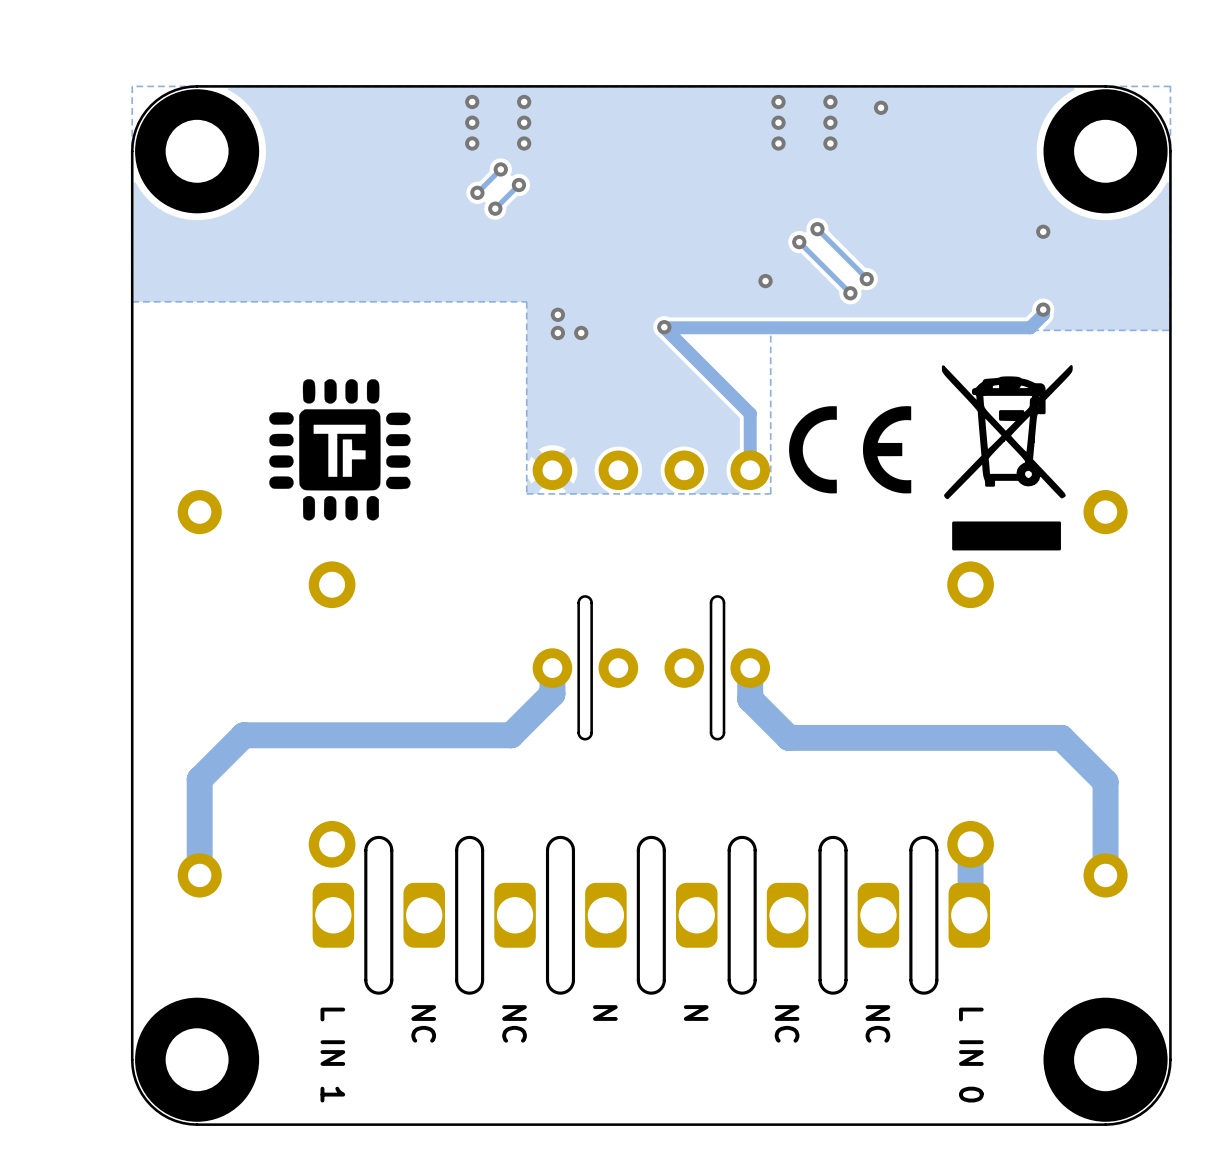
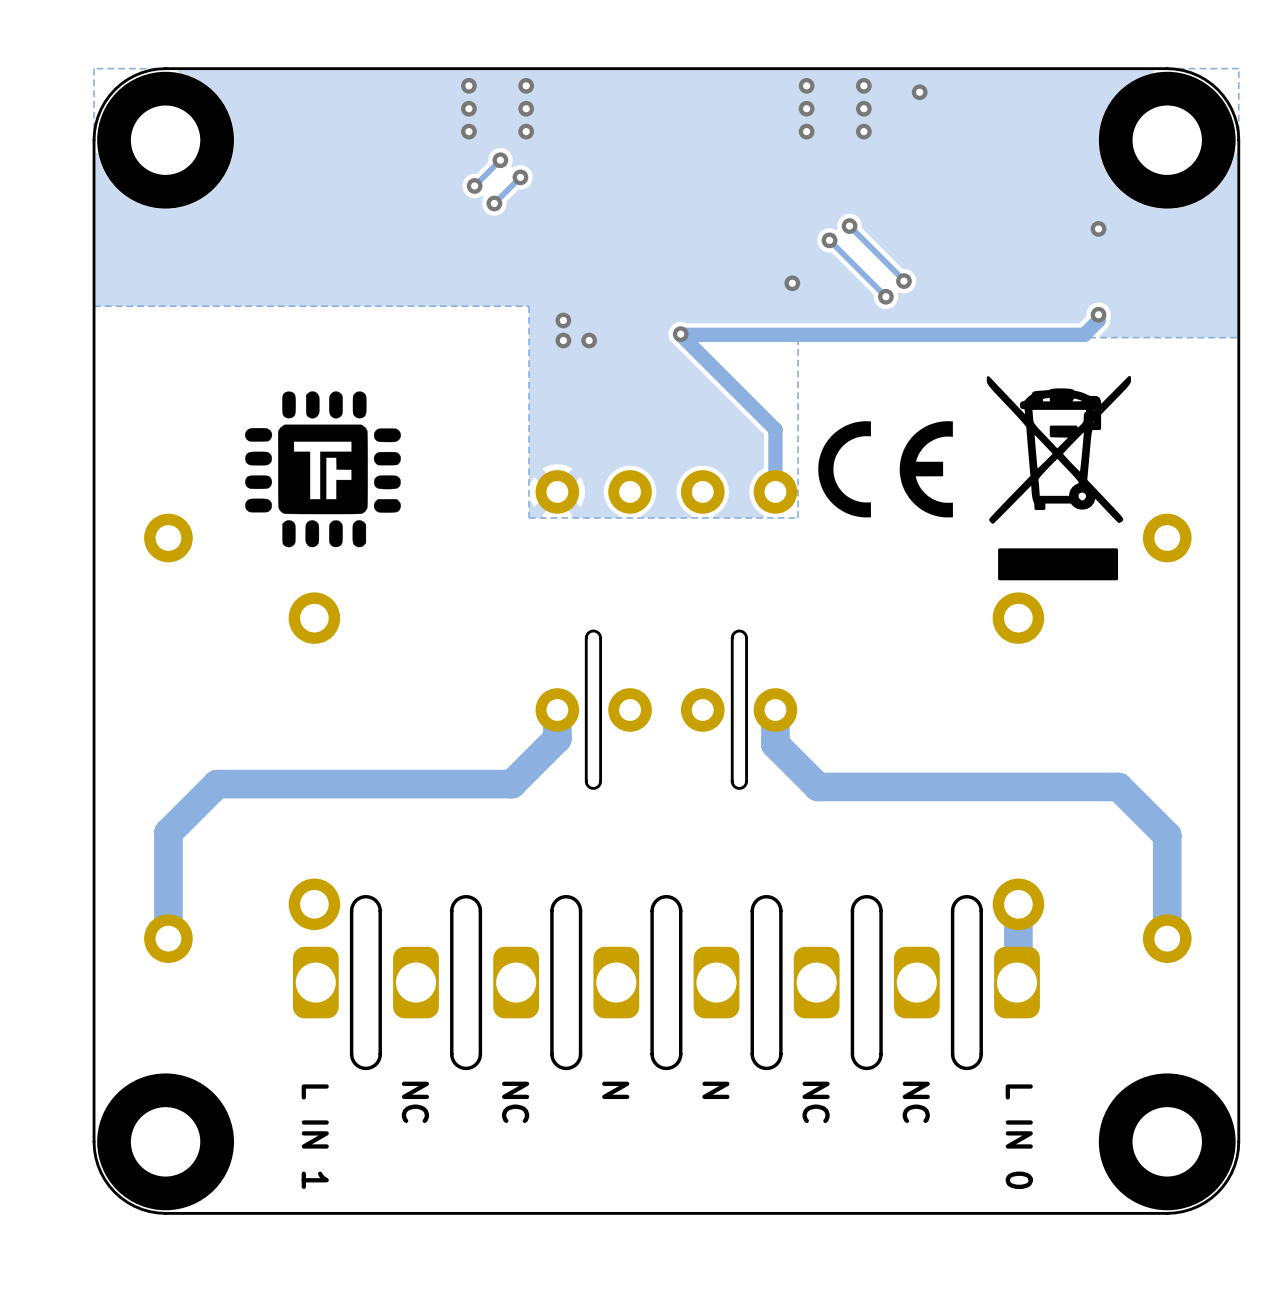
part footprint: [135, 89, 260, 214] -> [97, 71, 234, 209]
part footprint: [1043, 89, 1168, 214] -> [1098, 71, 1236, 209]

